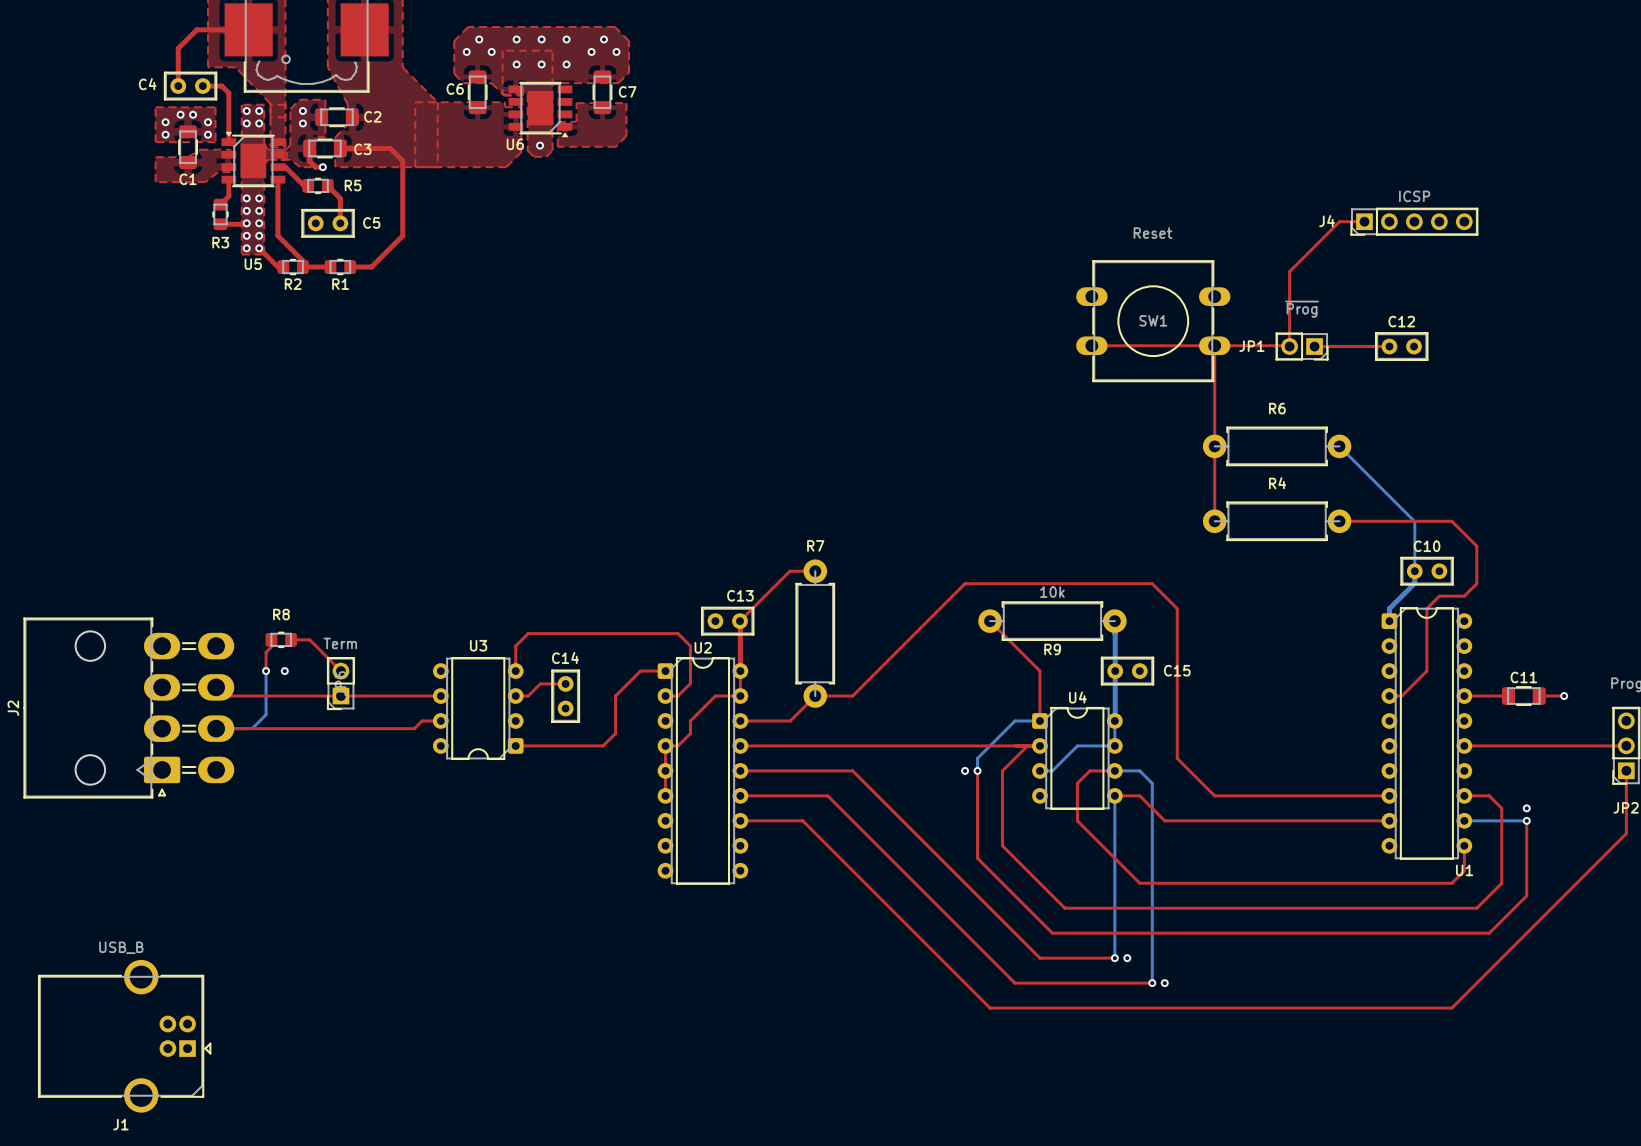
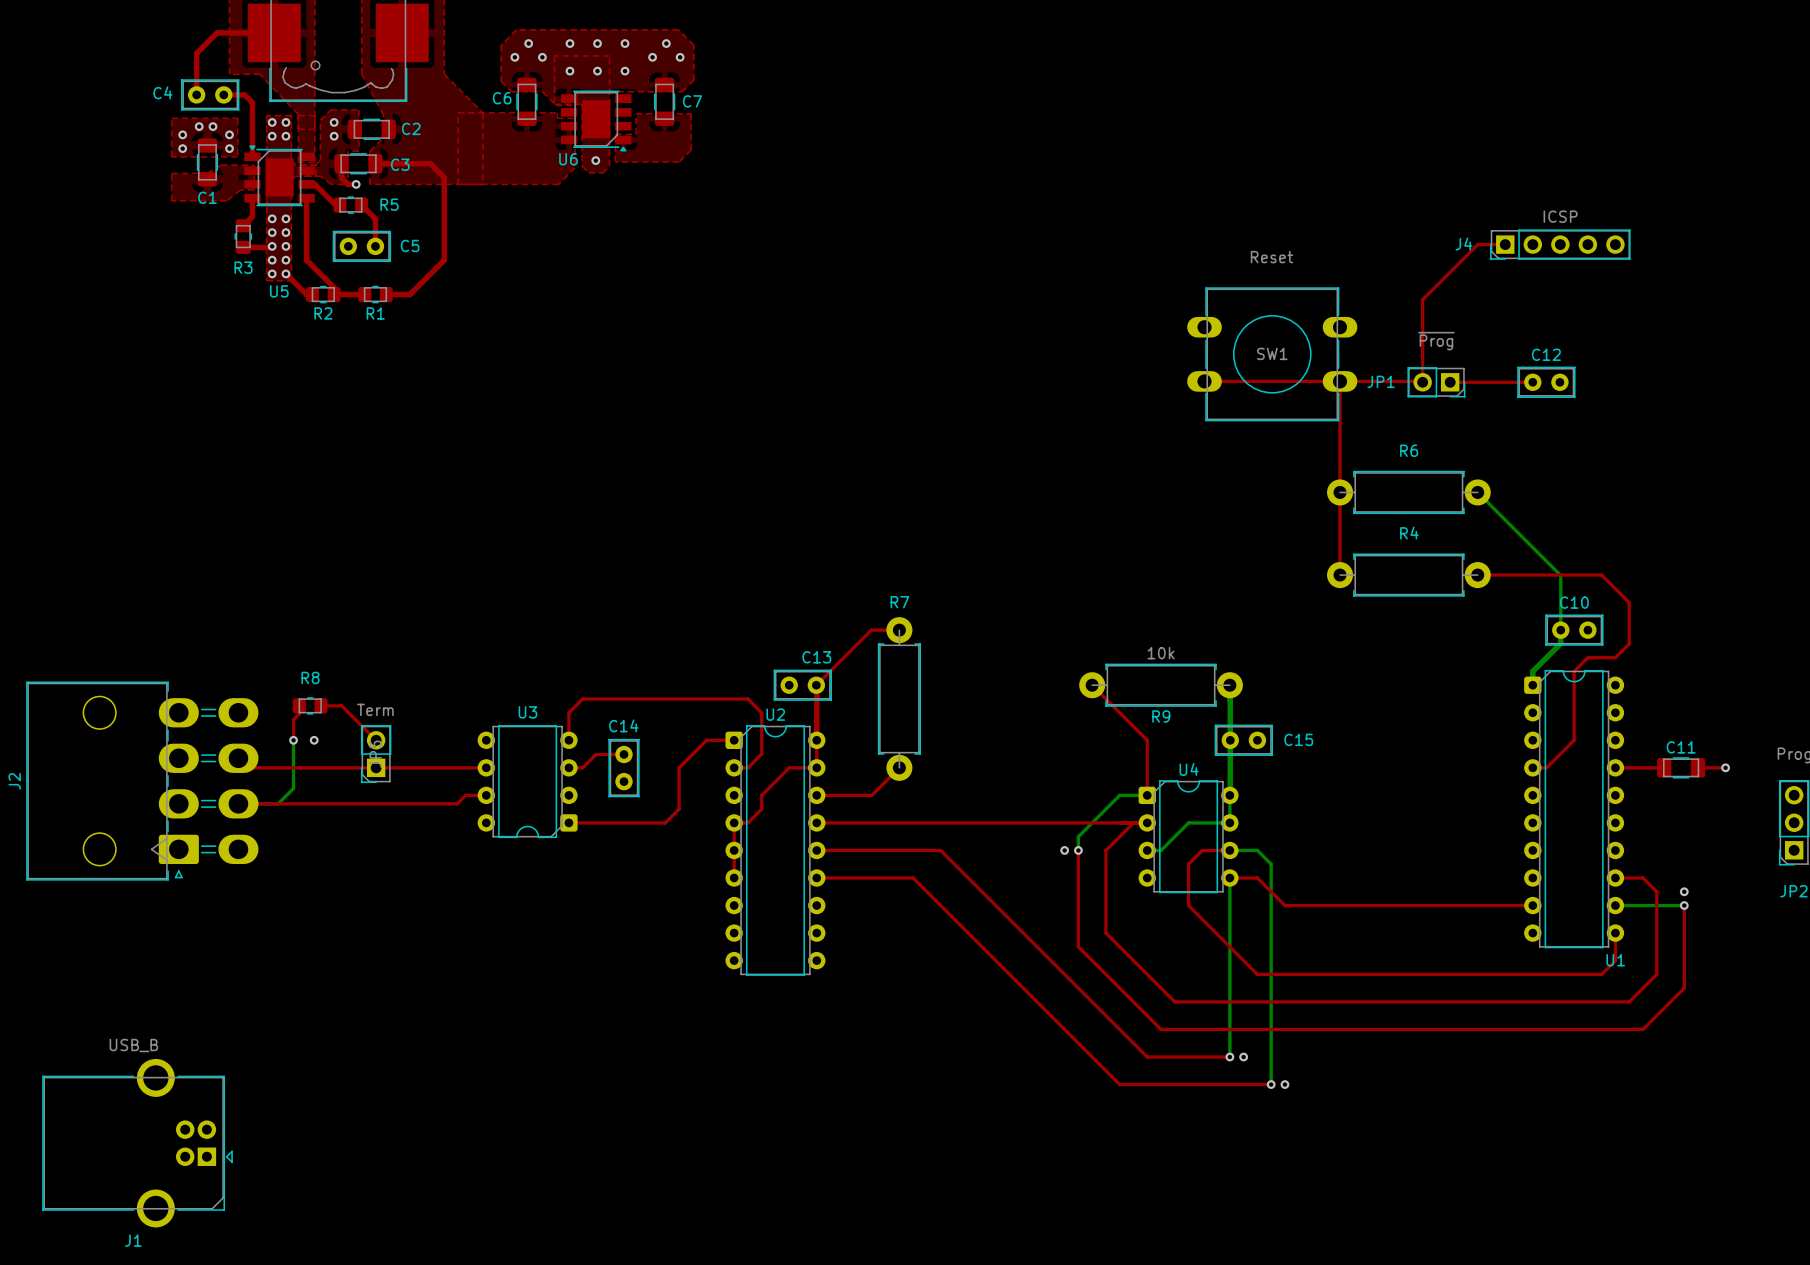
top track: (815, 696) (852, 696) (965, 583) (1152, 583) (1177, 608) (1177, 758) (1214, 795) (1389, 795) -> none
top track: (1626, 745) (1464, 745) -> none
top track: (1626, 770) (1626, 833) (1451, 1008) (990, 1008) (802, 820) (740, 820) -> none

